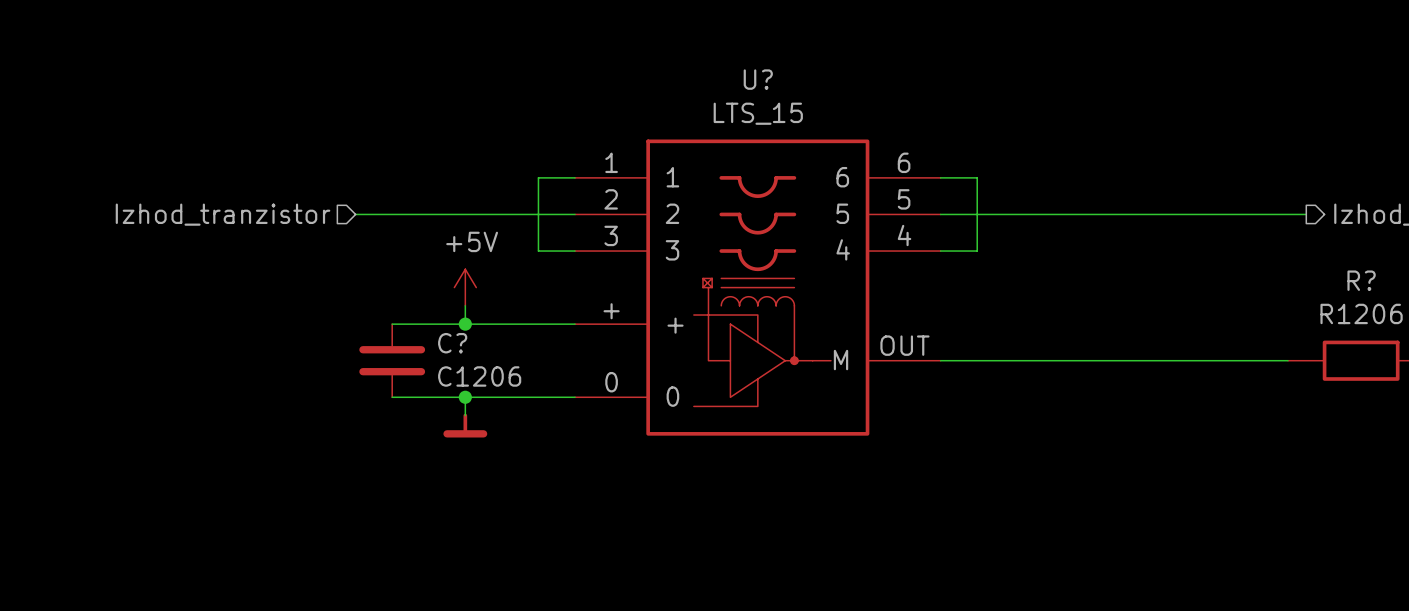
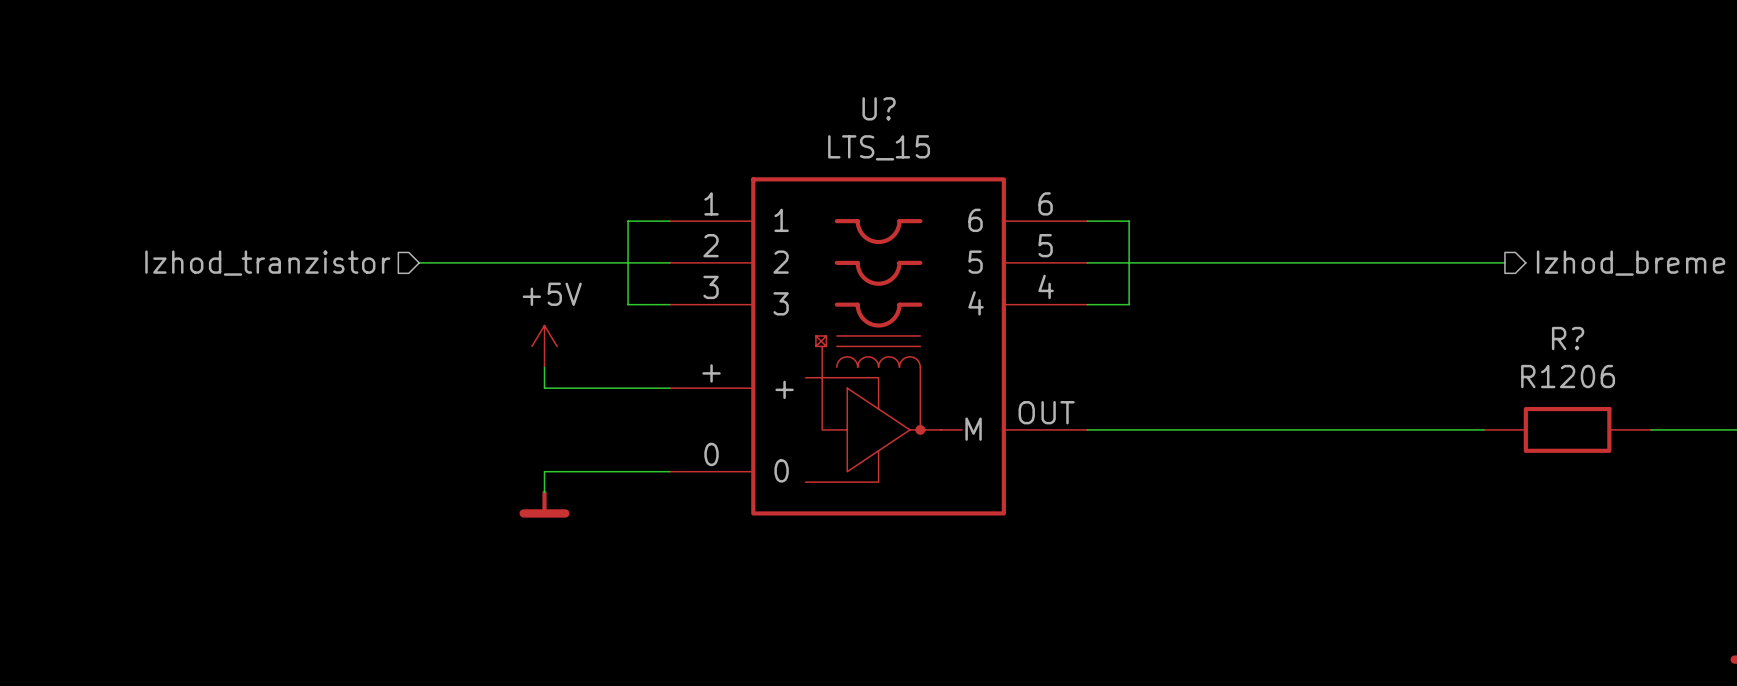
wire: (392, 324) (465, 324) -> none
junction: (465, 324) -> none
C?: C1206 (392, 360) -> none
wire: (392, 397) (465, 397) -> none
junction: (465, 397) -> none

